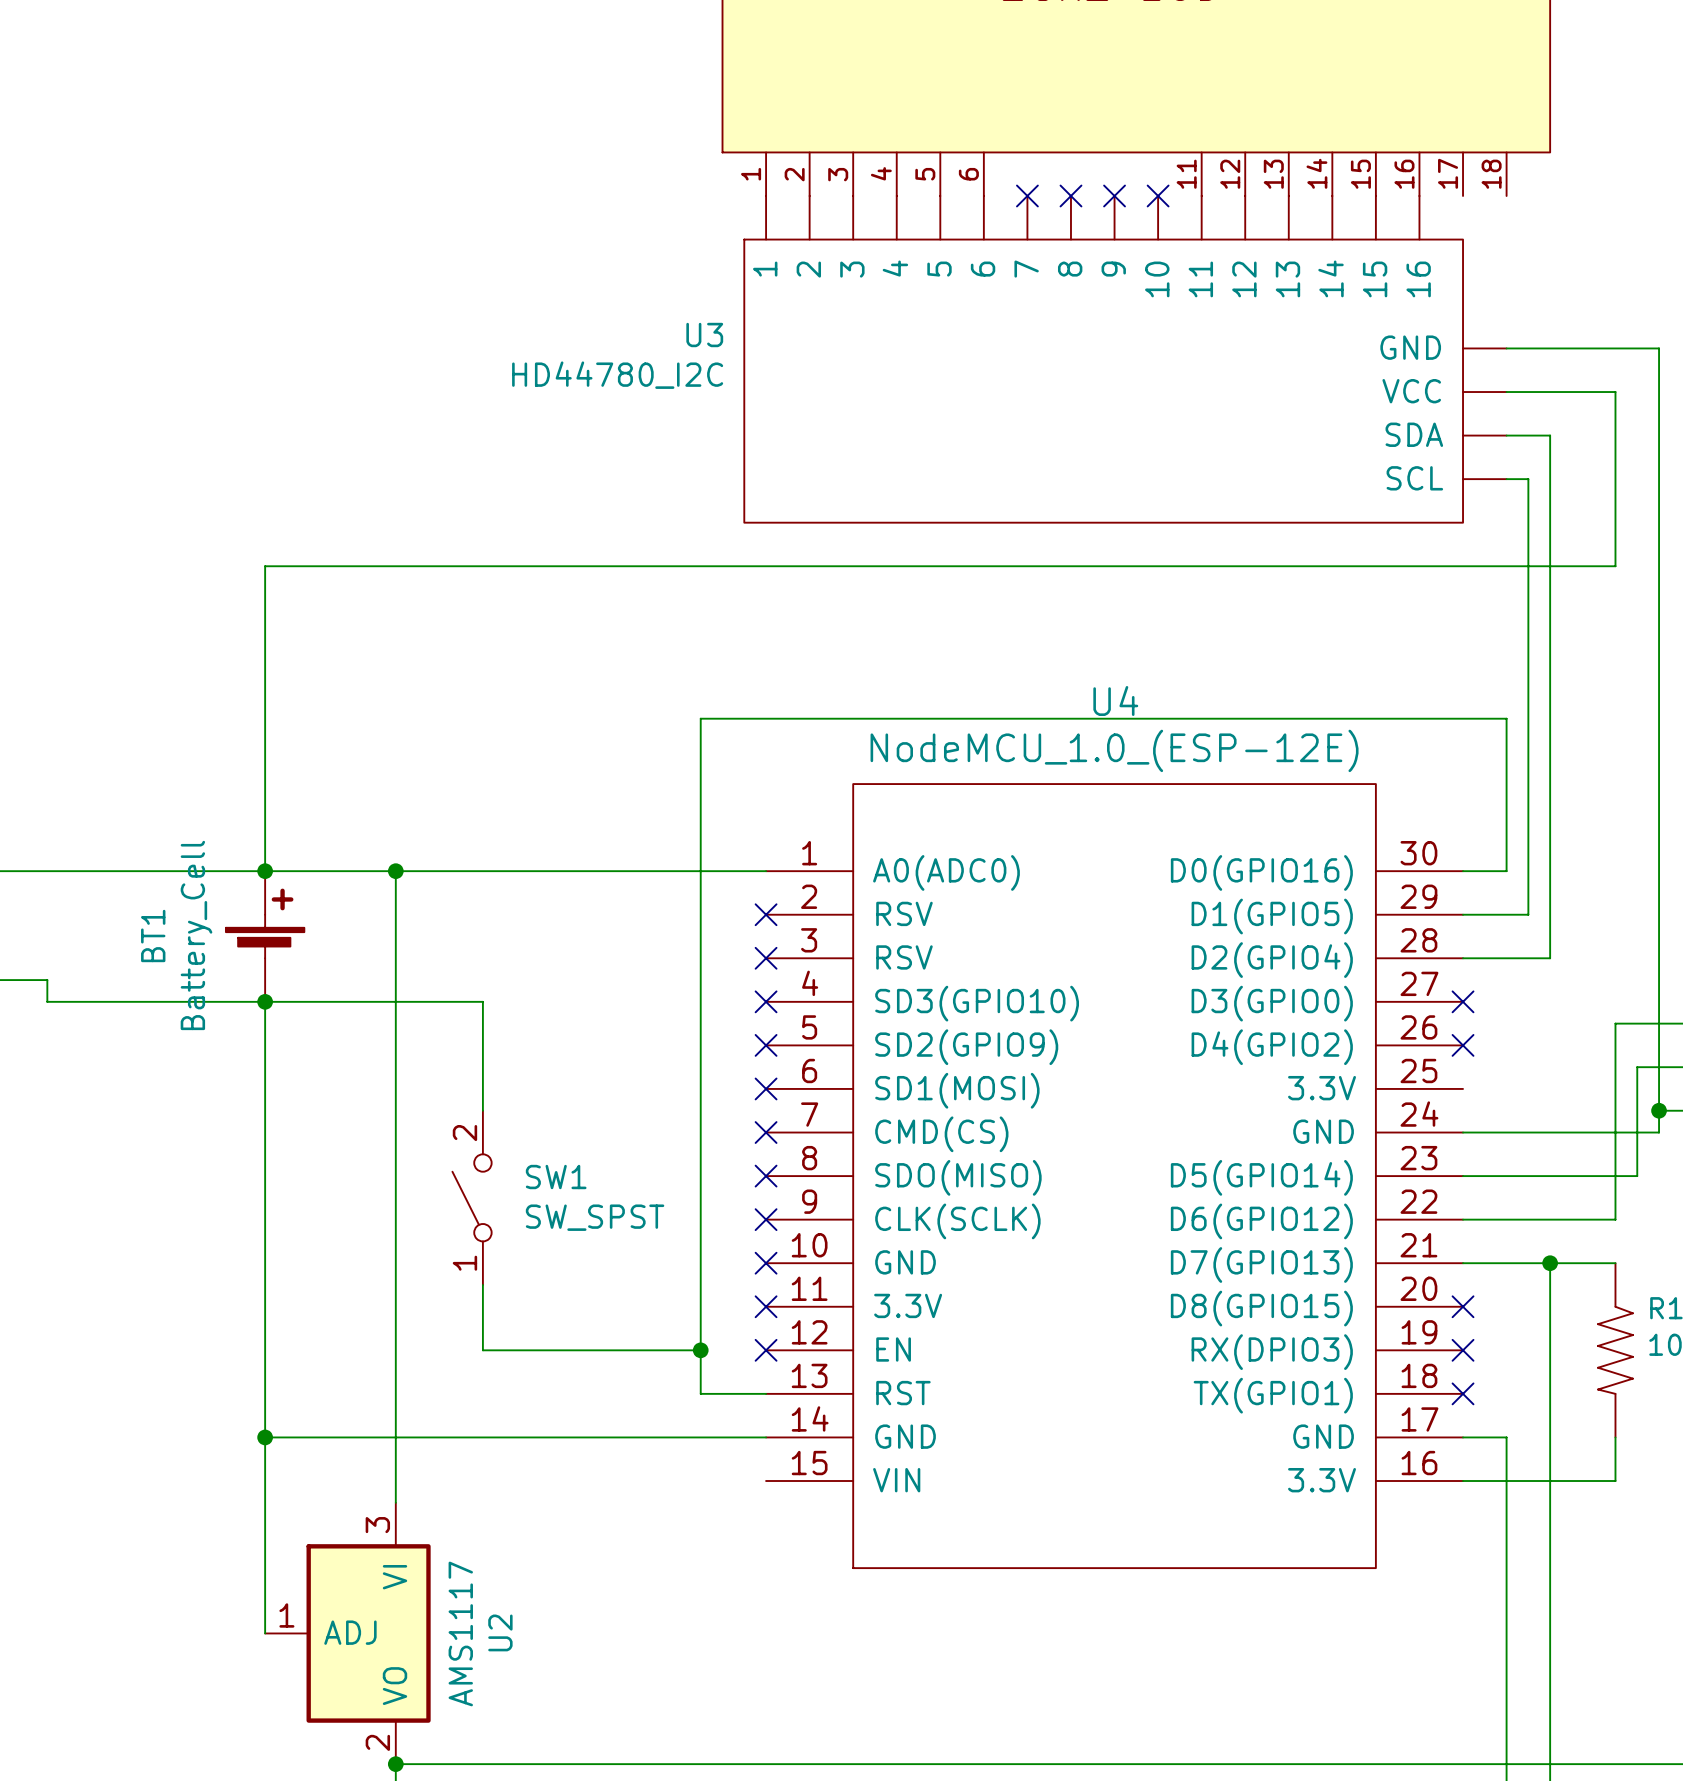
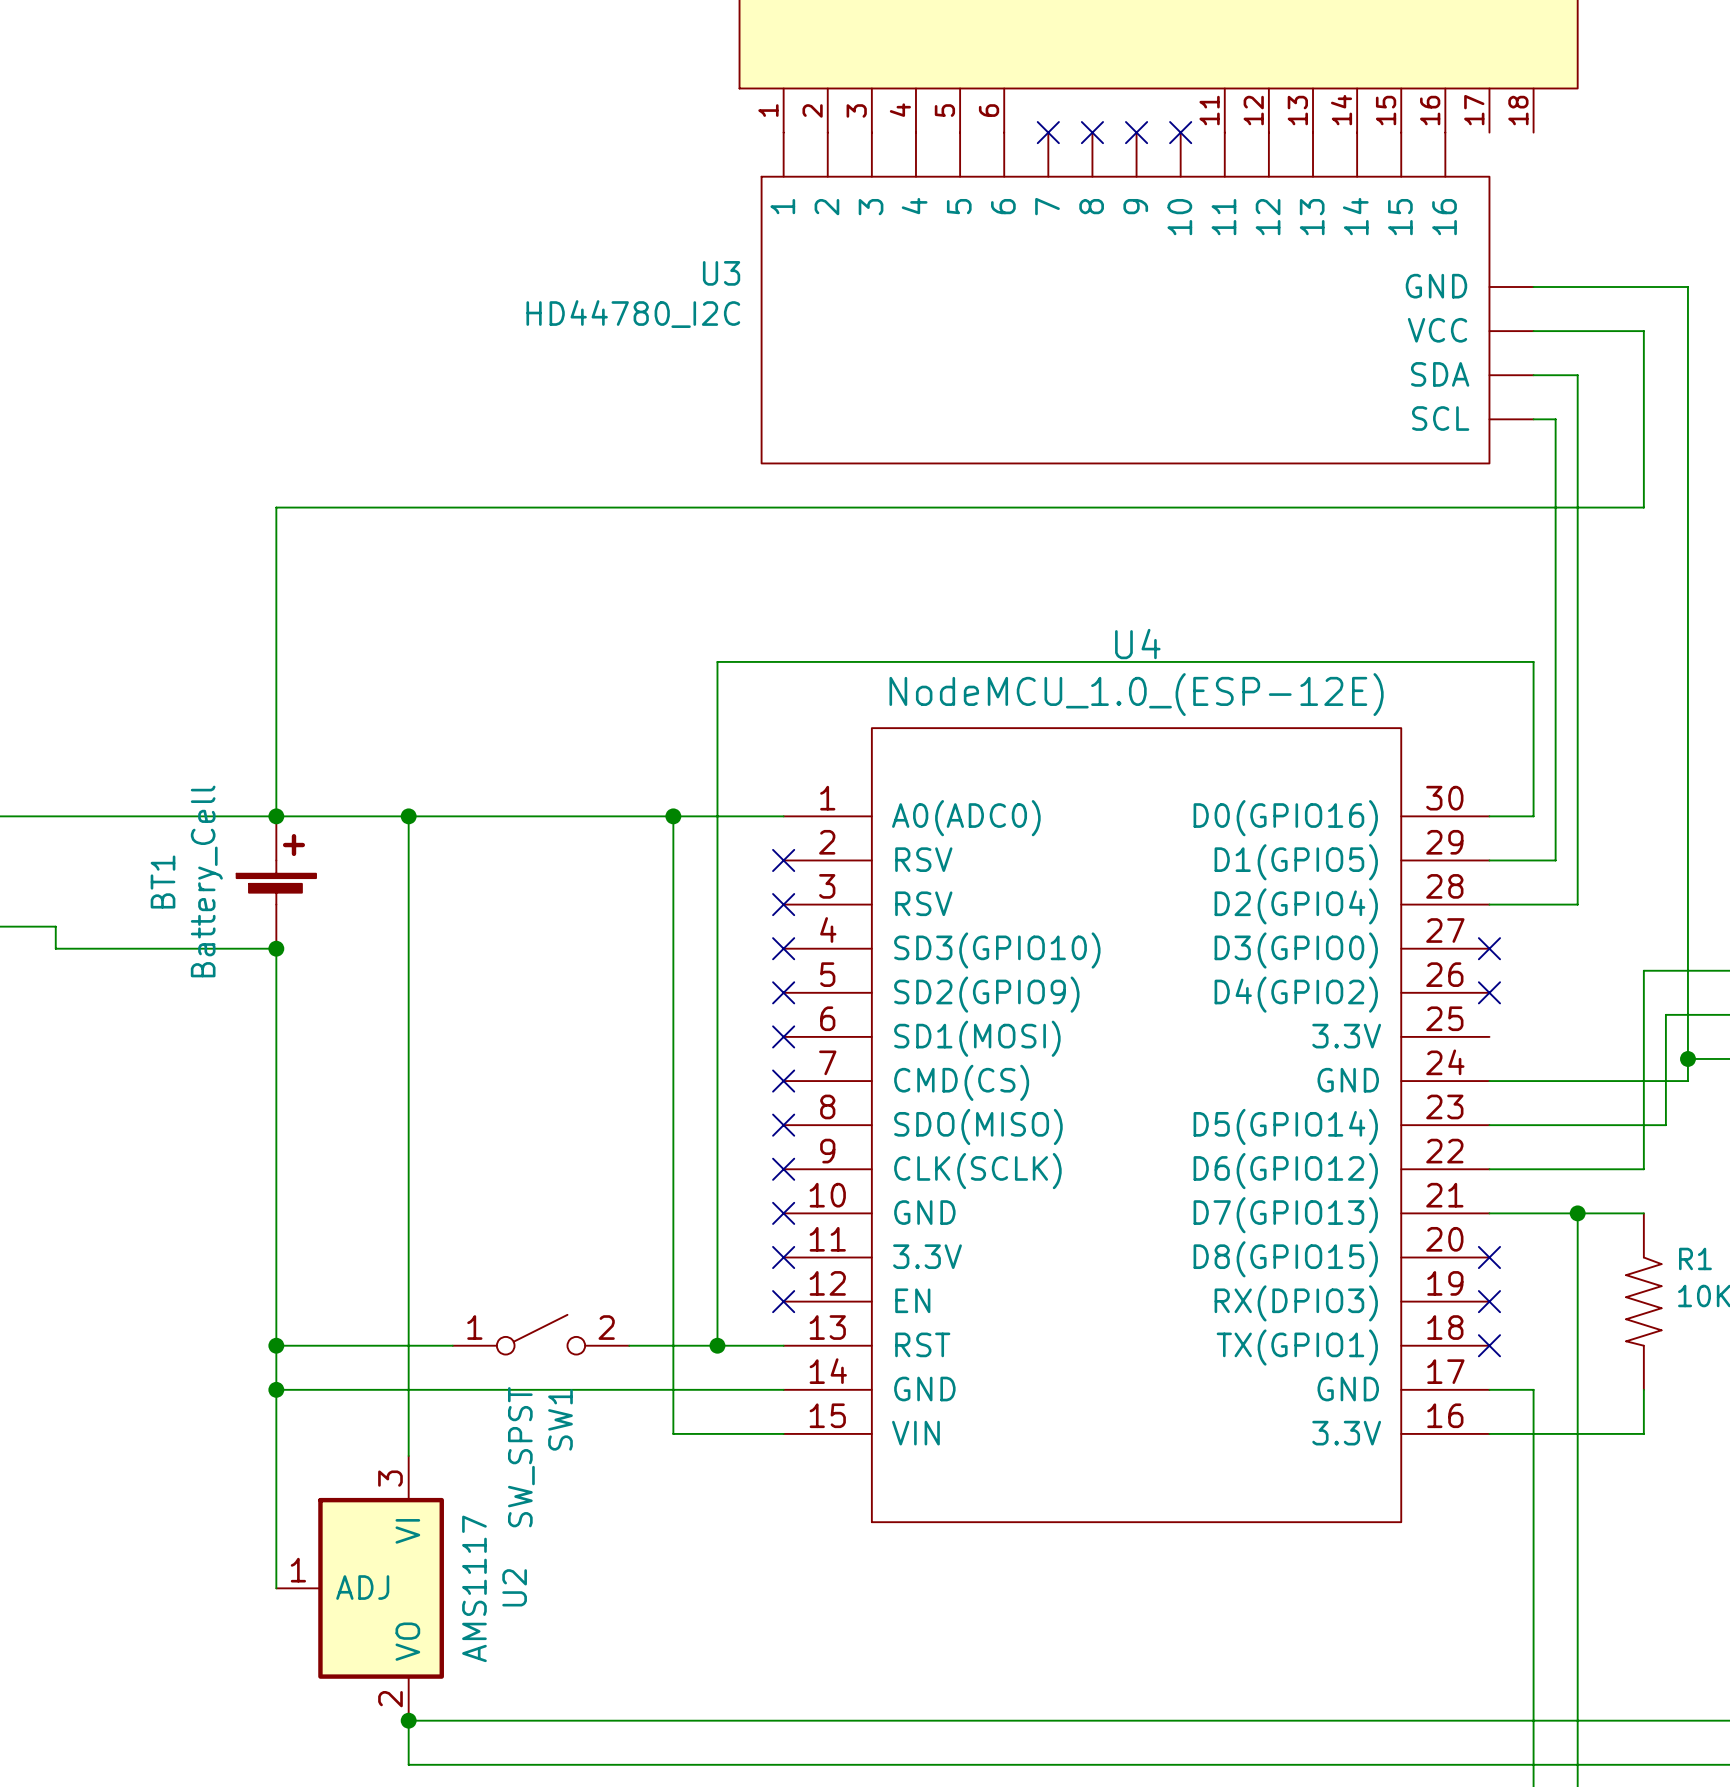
wire: none -> (673, 816) (673, 1433) (783, 1433)
junction: none -> (673, 816)
wire: (265, 1001) (482, 1001) (482, 1110) -> none
SW1 rotation: 0° (472, 1197) -> 90° clockwise (541, 1334)
SW1 position: (472, 1197) -> (541, 1334)
wire: (482, 1284) (482, 1350) (700, 1350) -> none
junction position: (700, 1350) -> (717, 1345)
wire: none -> (276, 1345) (452, 1345)
junction: none -> (276, 1345)
wire: none -> (629, 1345) (717, 1345)

